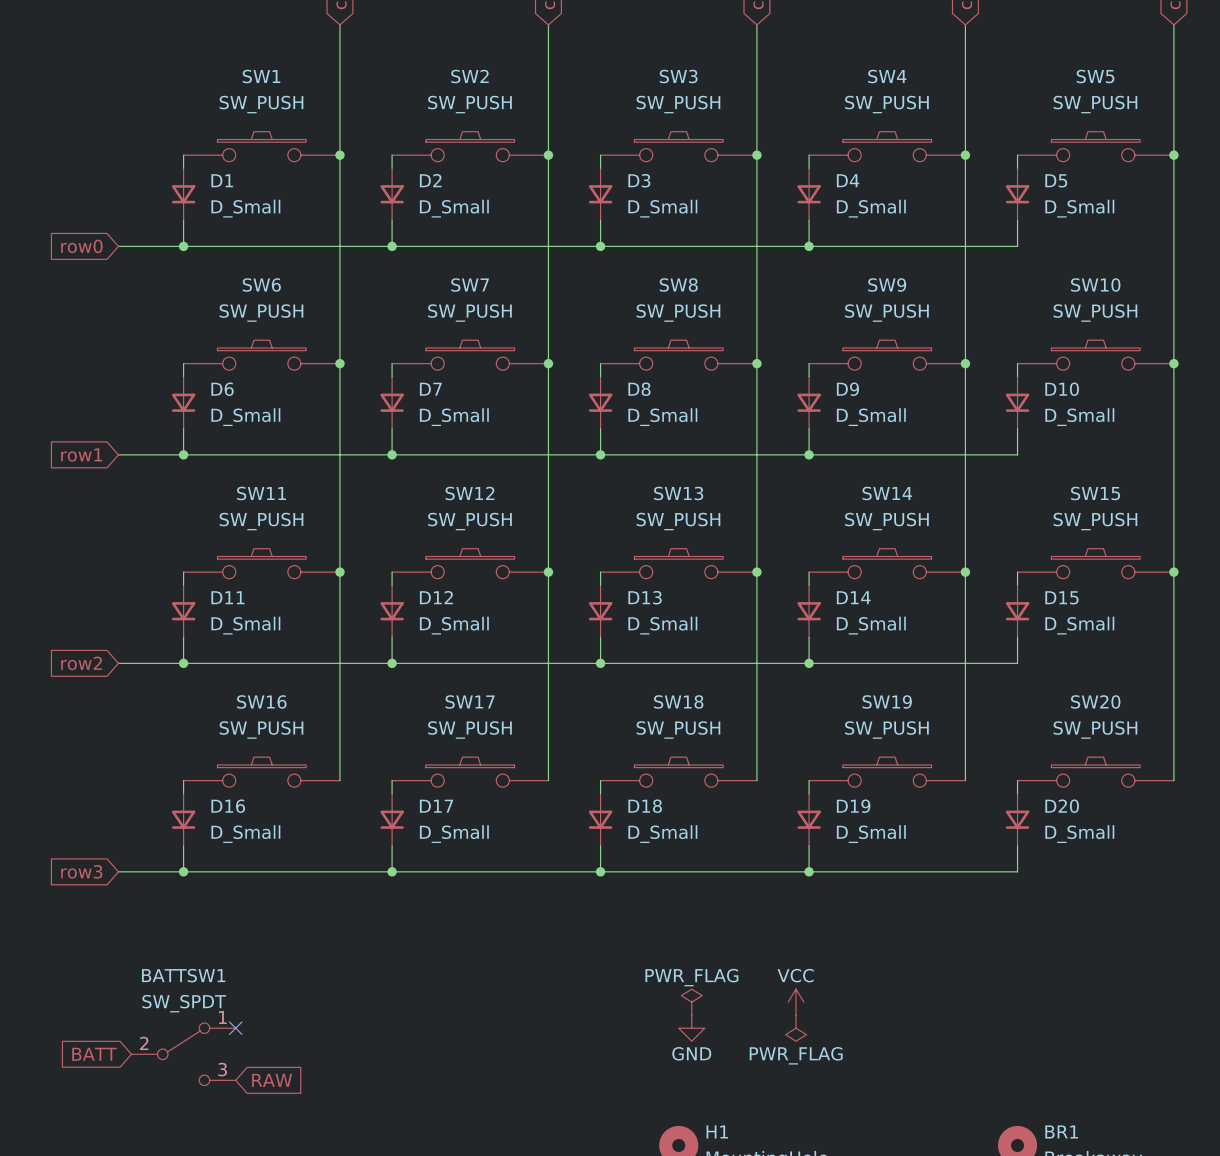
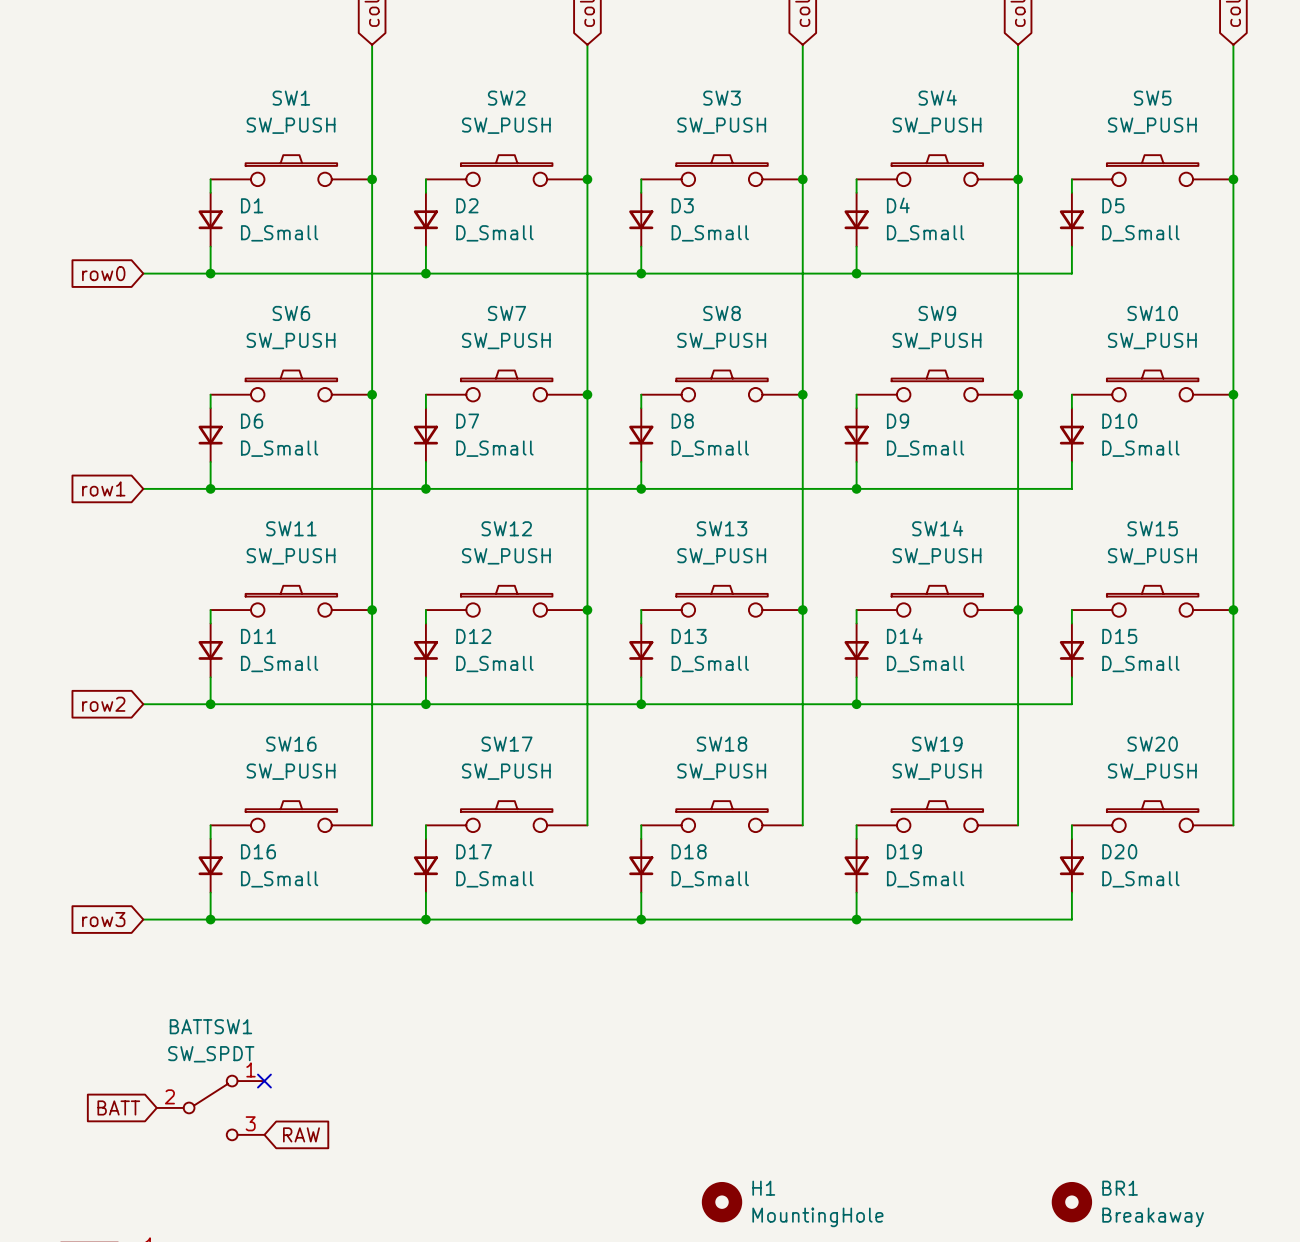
power symbol: PWR_FLAG (691, 1002) -> none
power symbol: VCC (796, 1002) -> none
power symbol: GND (691, 1028) -> none
power symbol: PWR_FLAG (796, 1028) -> none

